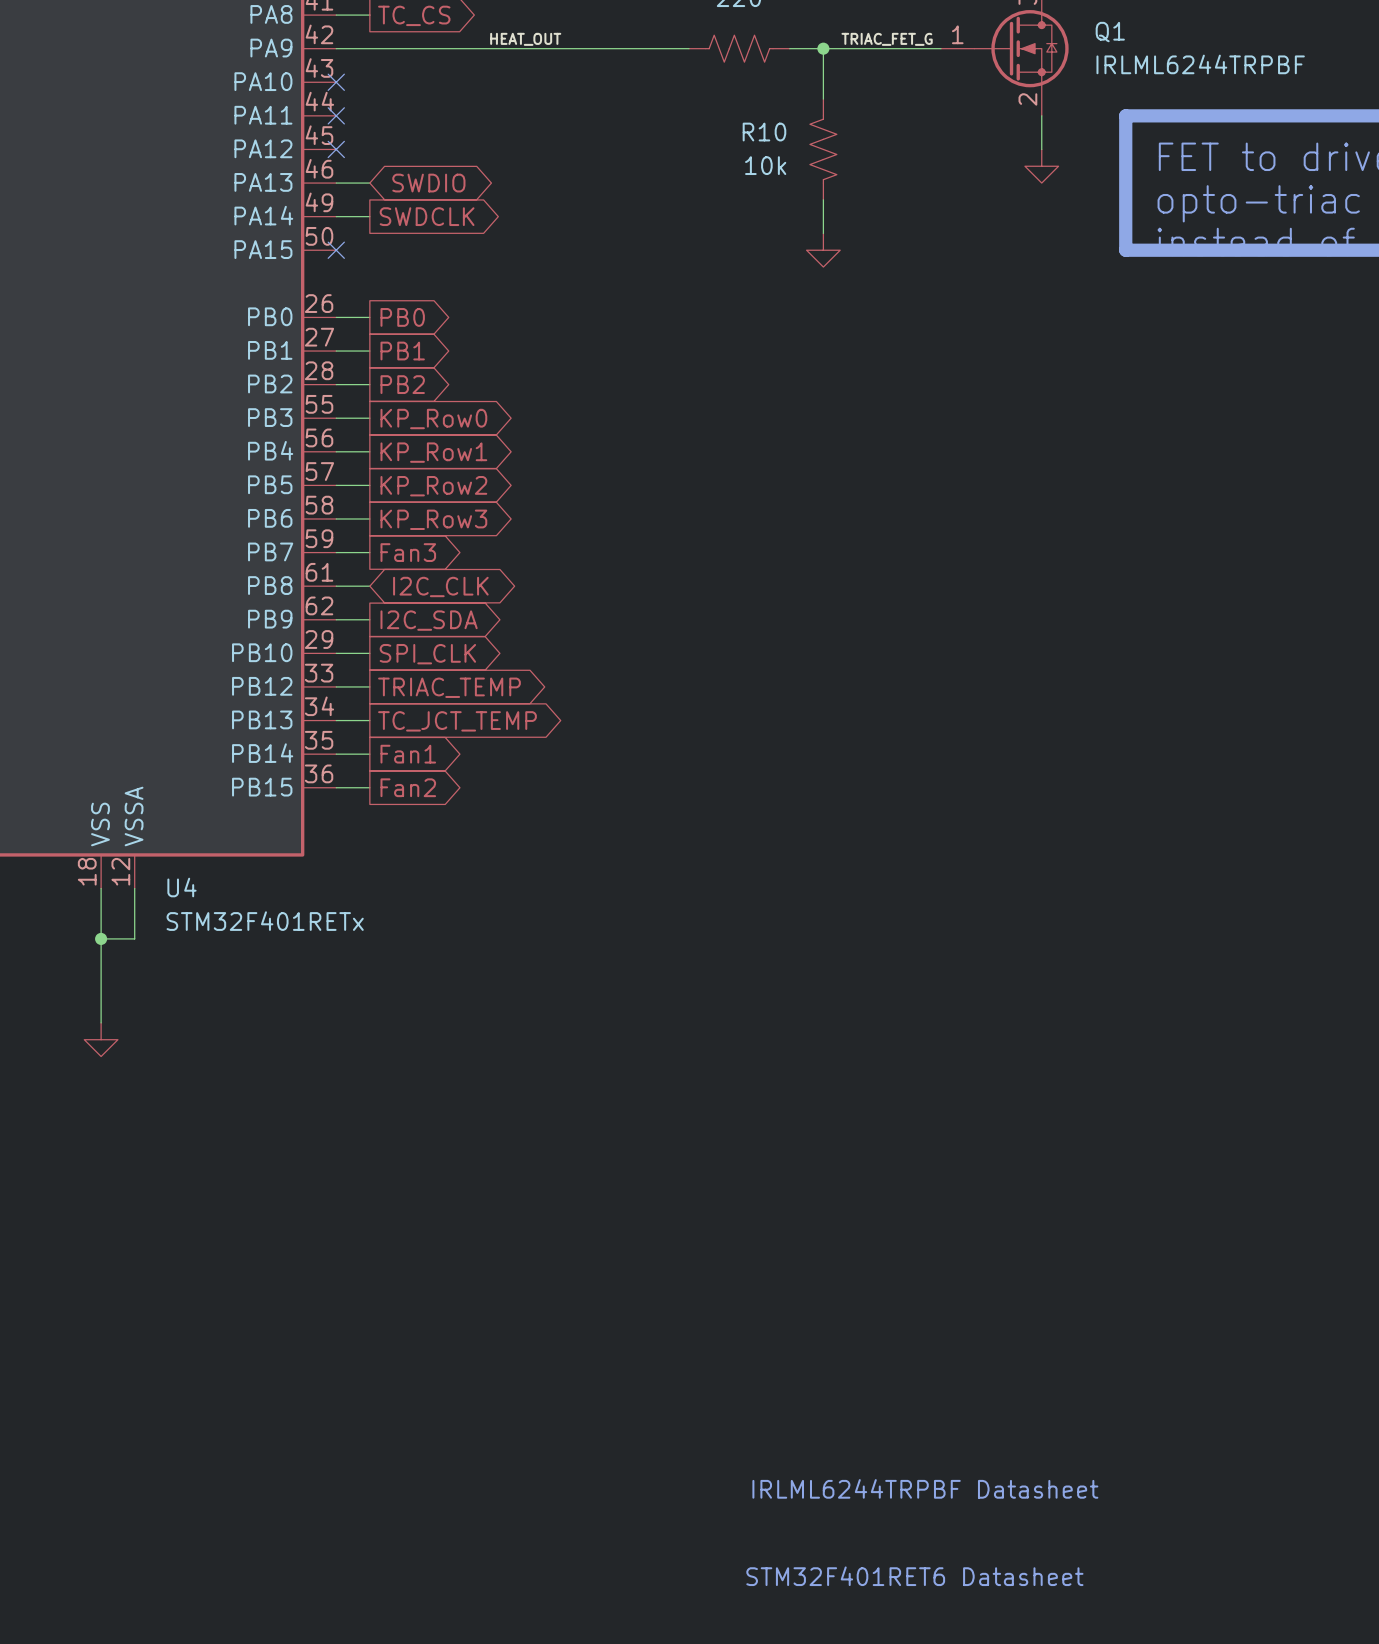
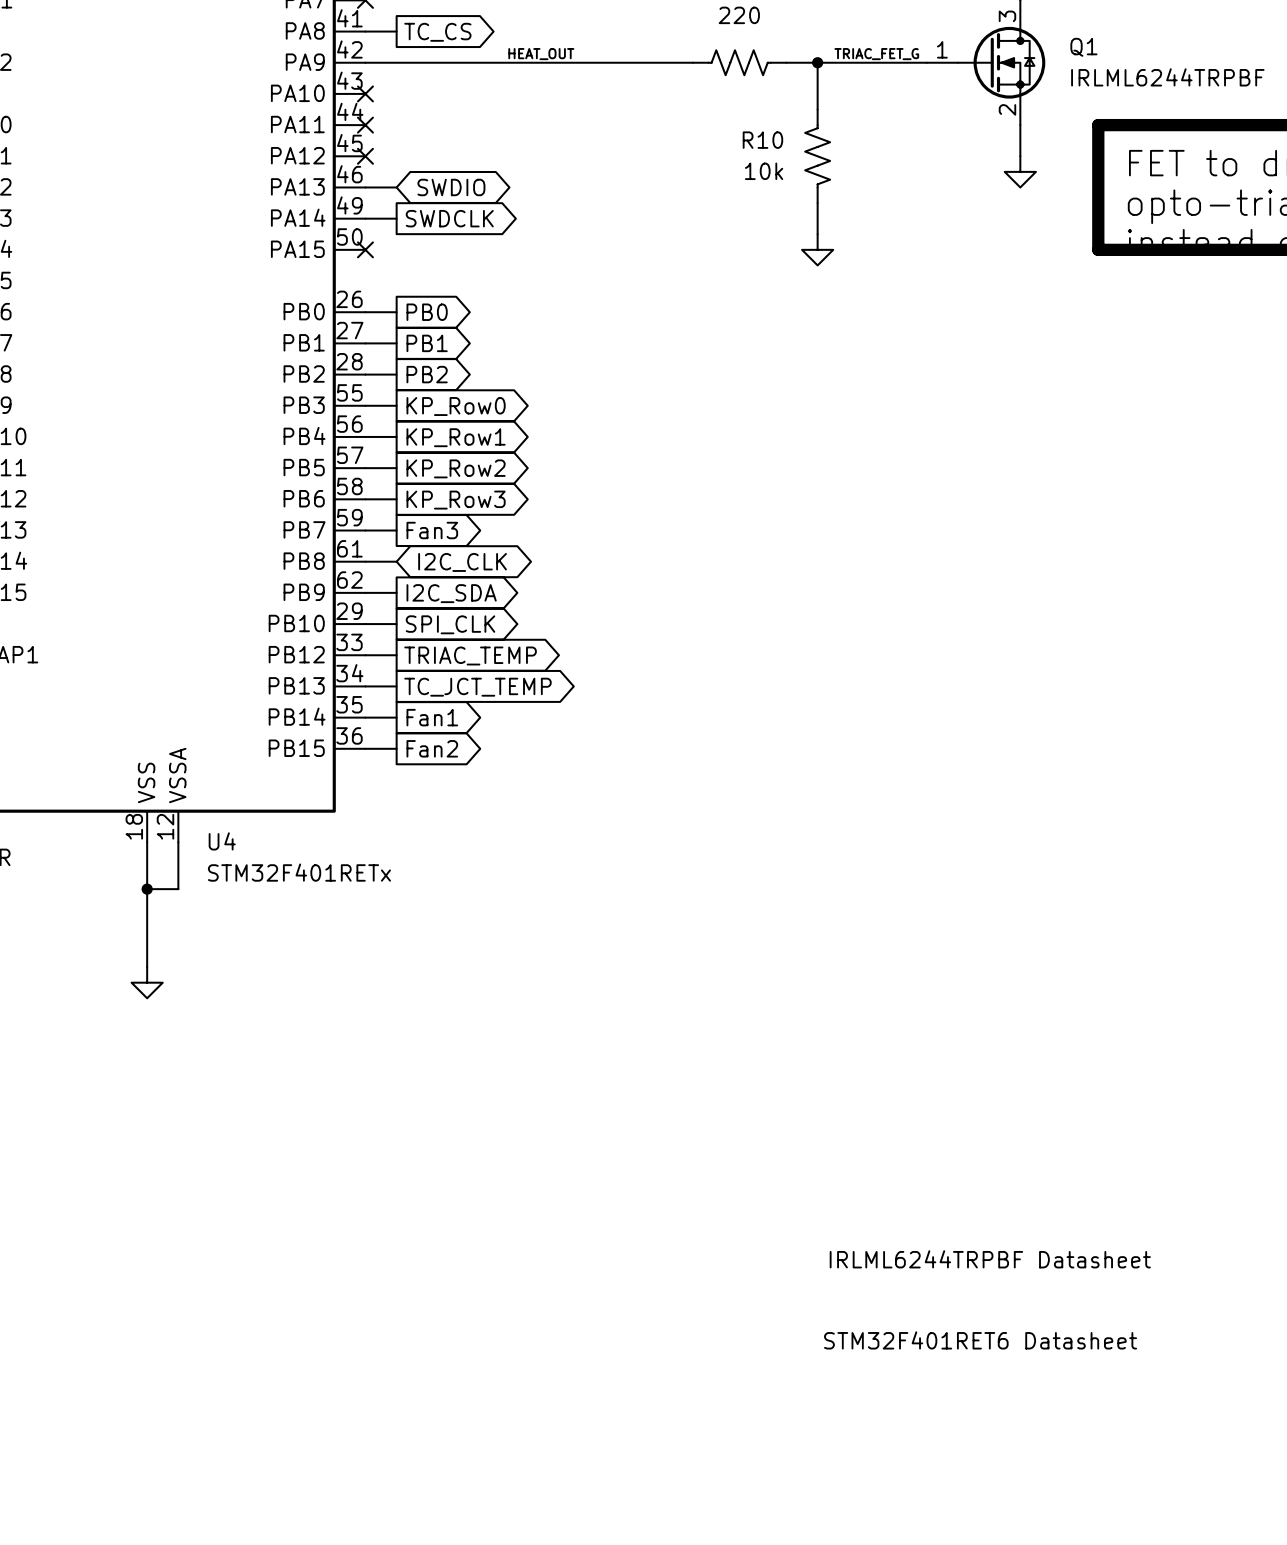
text position: IRLML6244TRPBF Datasheet (925, 1488) -> IRLML6244TRPBF Datasheet (990, 1259)
text position: STM32F401RET6 Datasheet (914, 1576) -> STM32F401RET6 Datasheet (980, 1340)

